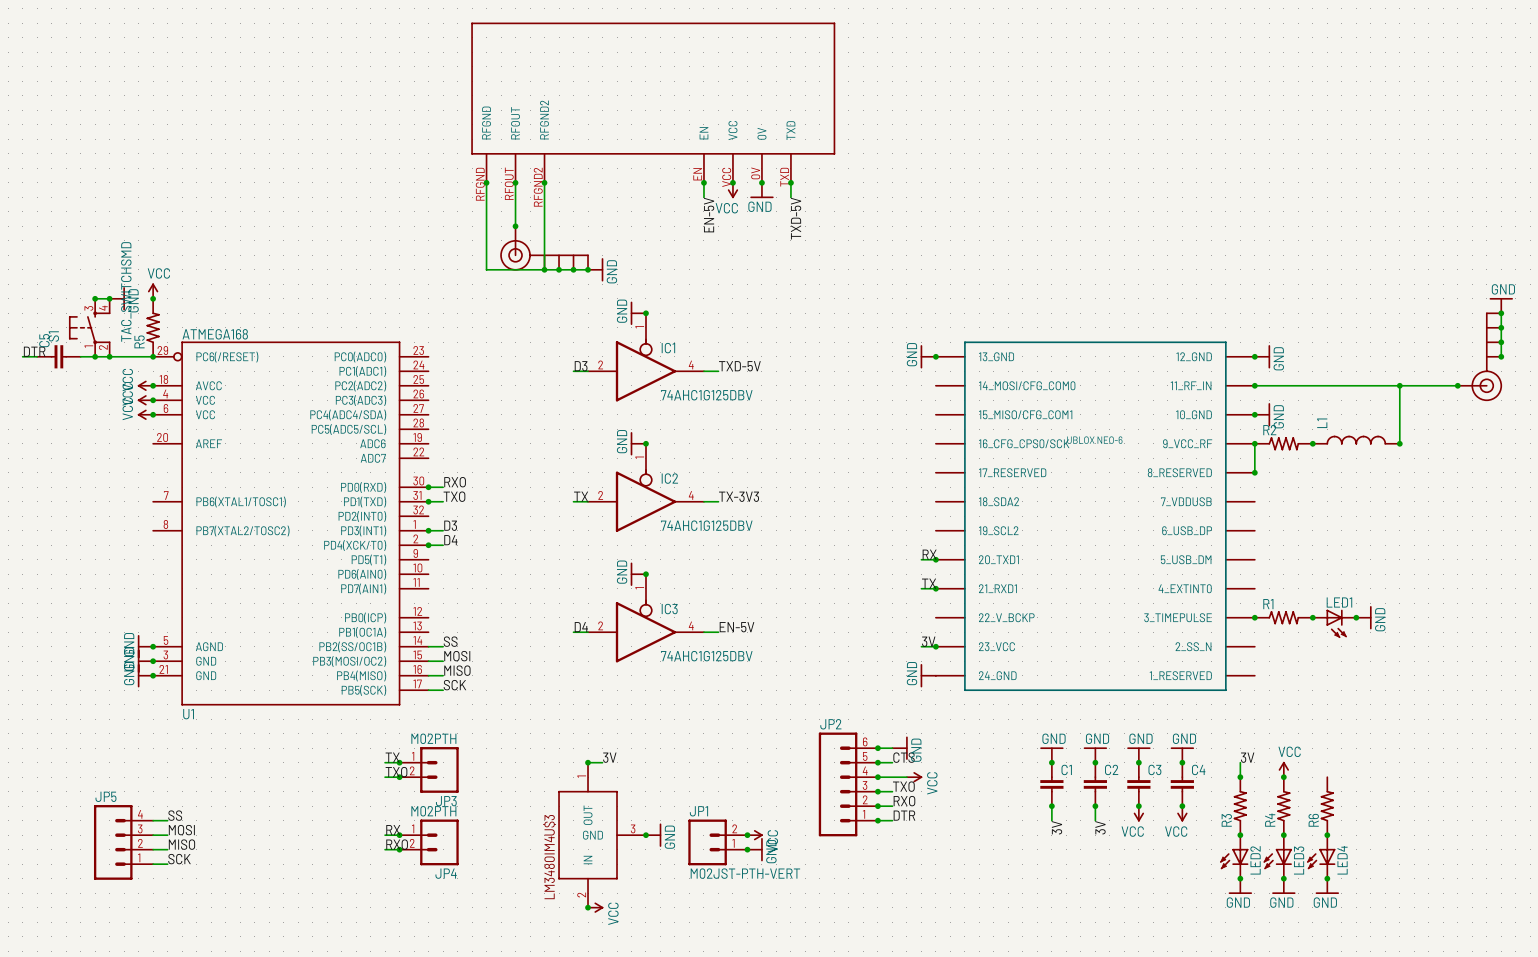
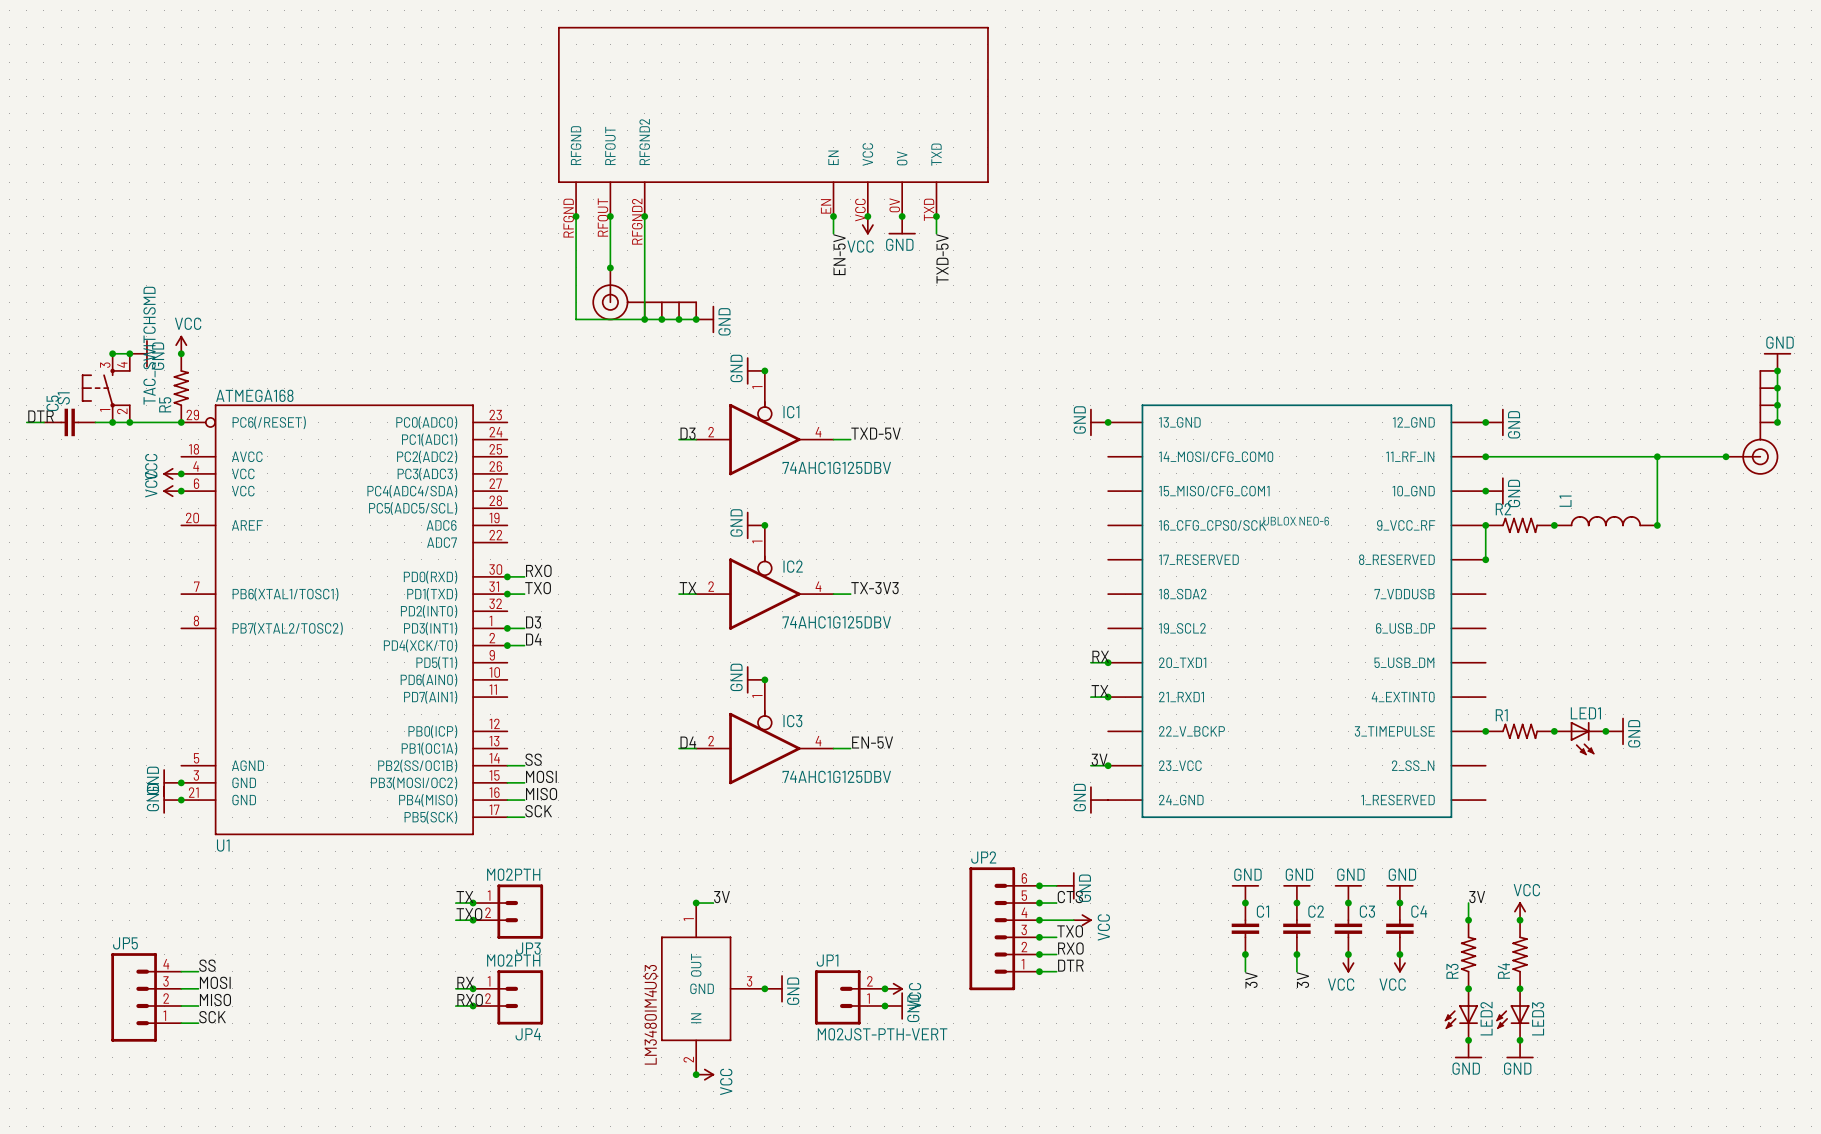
power symbol: VCC (145, 385) -> none
junction: (153, 385) -> none
power symbol: GND (145, 646) -> none
junction: (153, 646) -> none
R6: (1327, 806) -> none
junction: (1327, 835) -> none
LED4: (1321, 856) -> none
junction: (1327, 878) -> none
power symbol: GND (1327, 886) -> none

